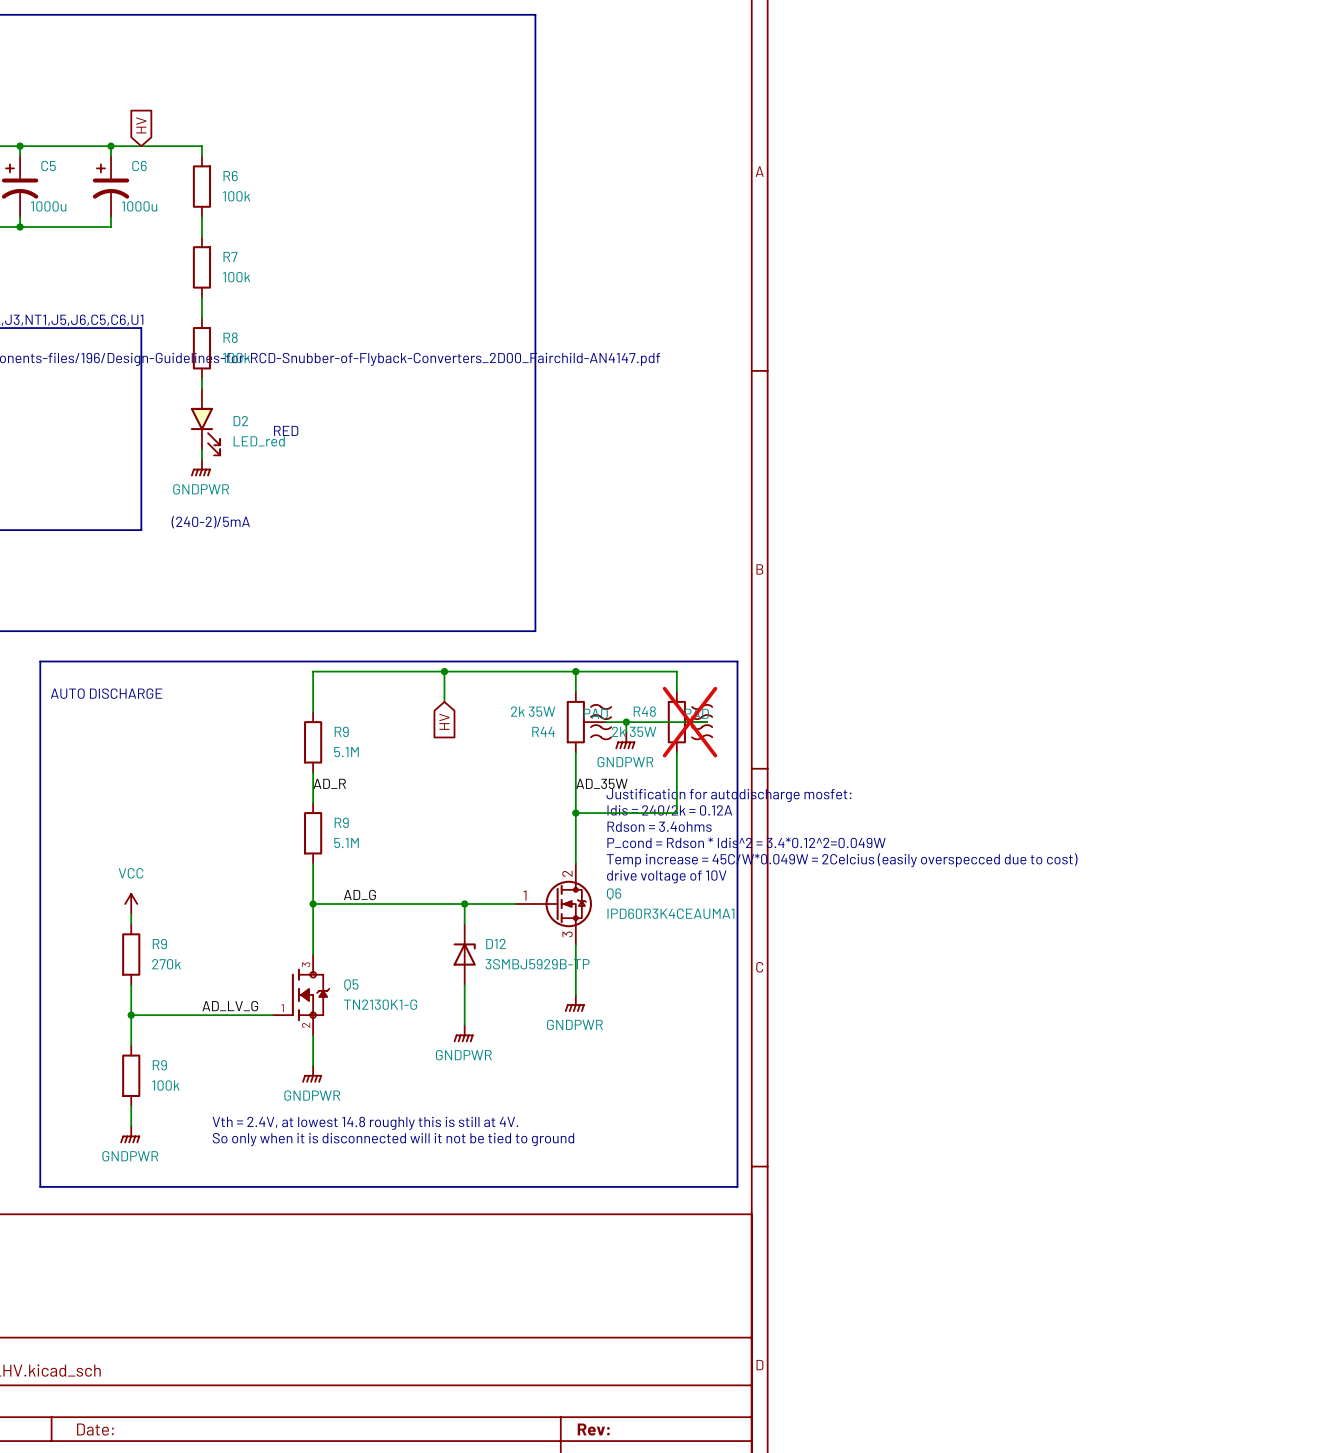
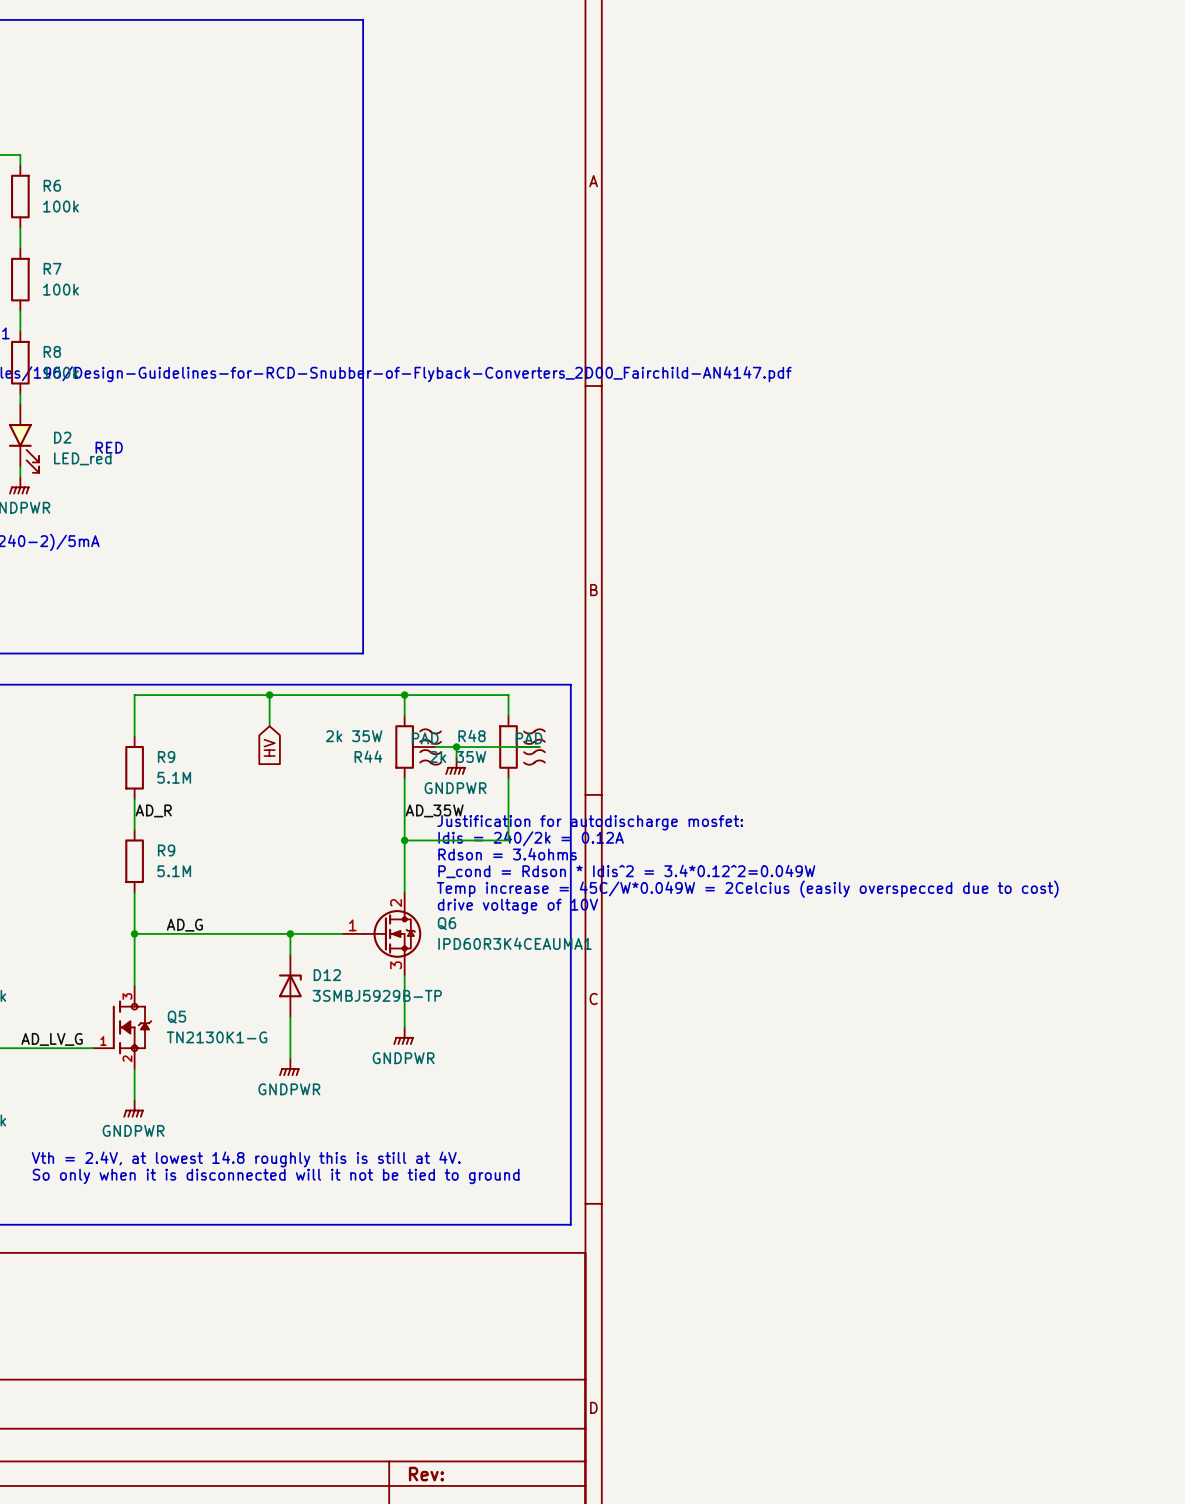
R48 do-not-place cross: (690, 722) -> none

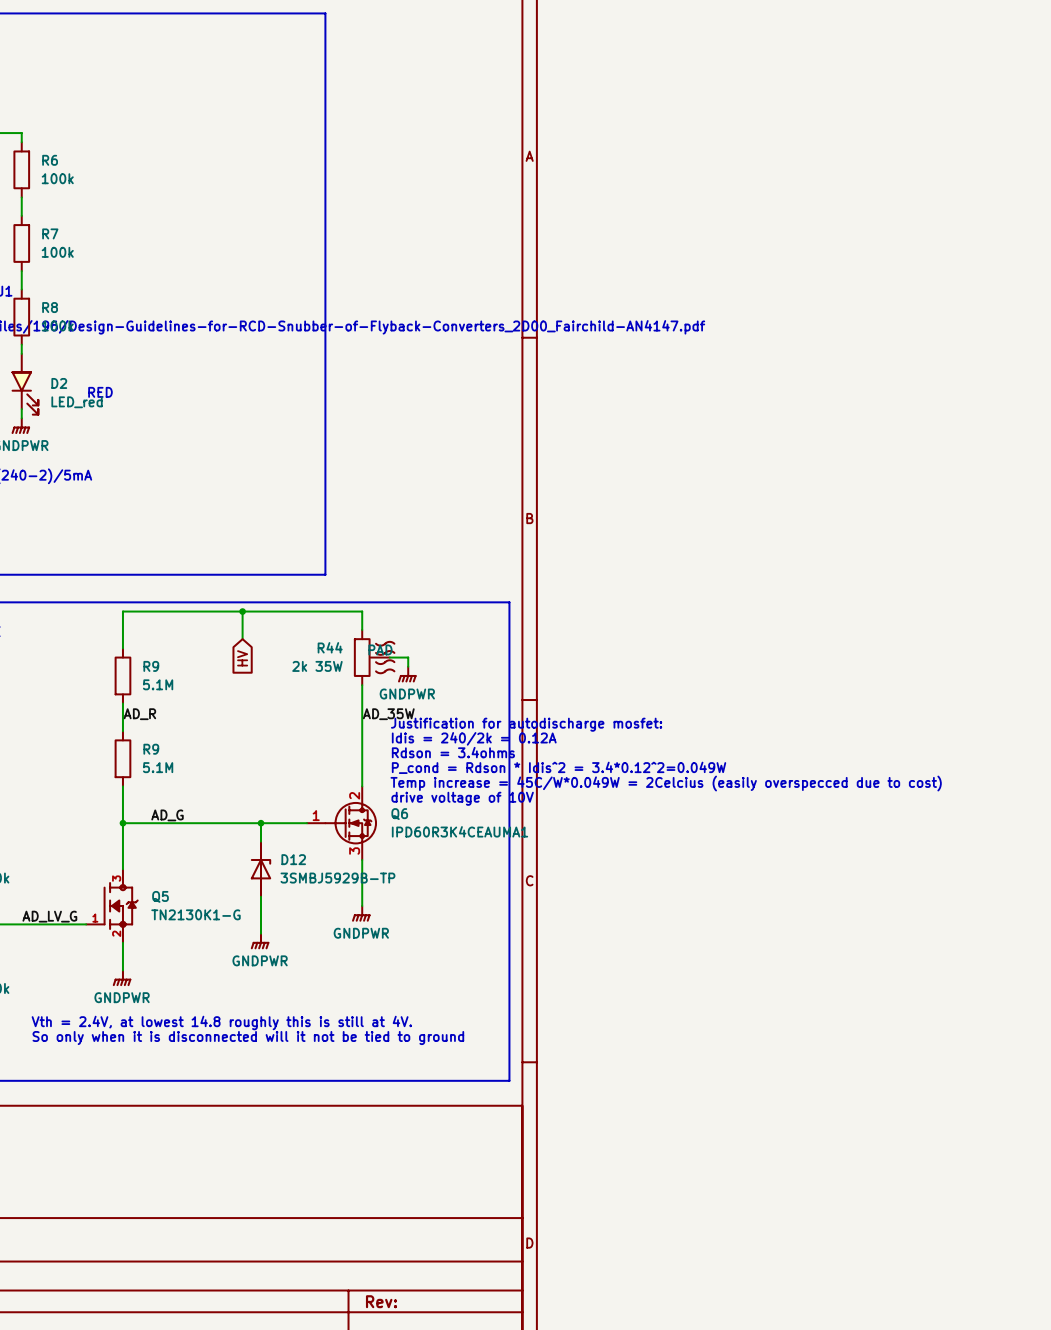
wire: (404, 695) (508, 695) (508, 715) -> none
junction: (404, 695) -> none
R44 flip: as is (418, 747) -> up-down (374, 657)
wire: (456, 747) (539, 747) -> none
junction: (456, 747) -> none
R48: 2k 35W (522, 747) -> none
wire: (508, 778) (508, 840) (404, 840) -> none
junction: (404, 840) -> none

